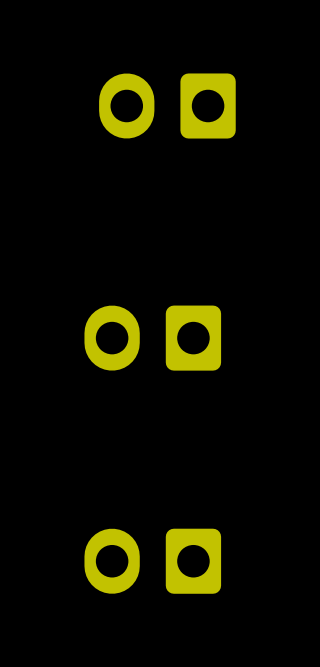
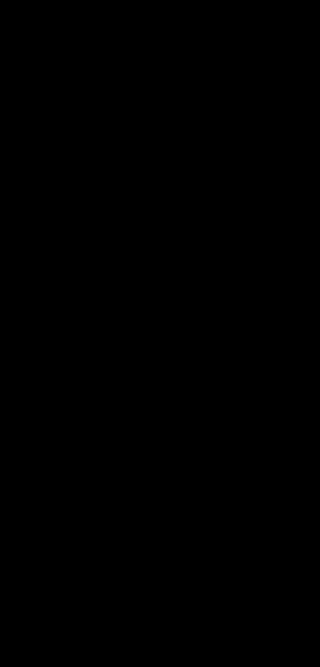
part: (167, 106) -> none
part: (152, 338) -> none
part: (152, 561) -> none

